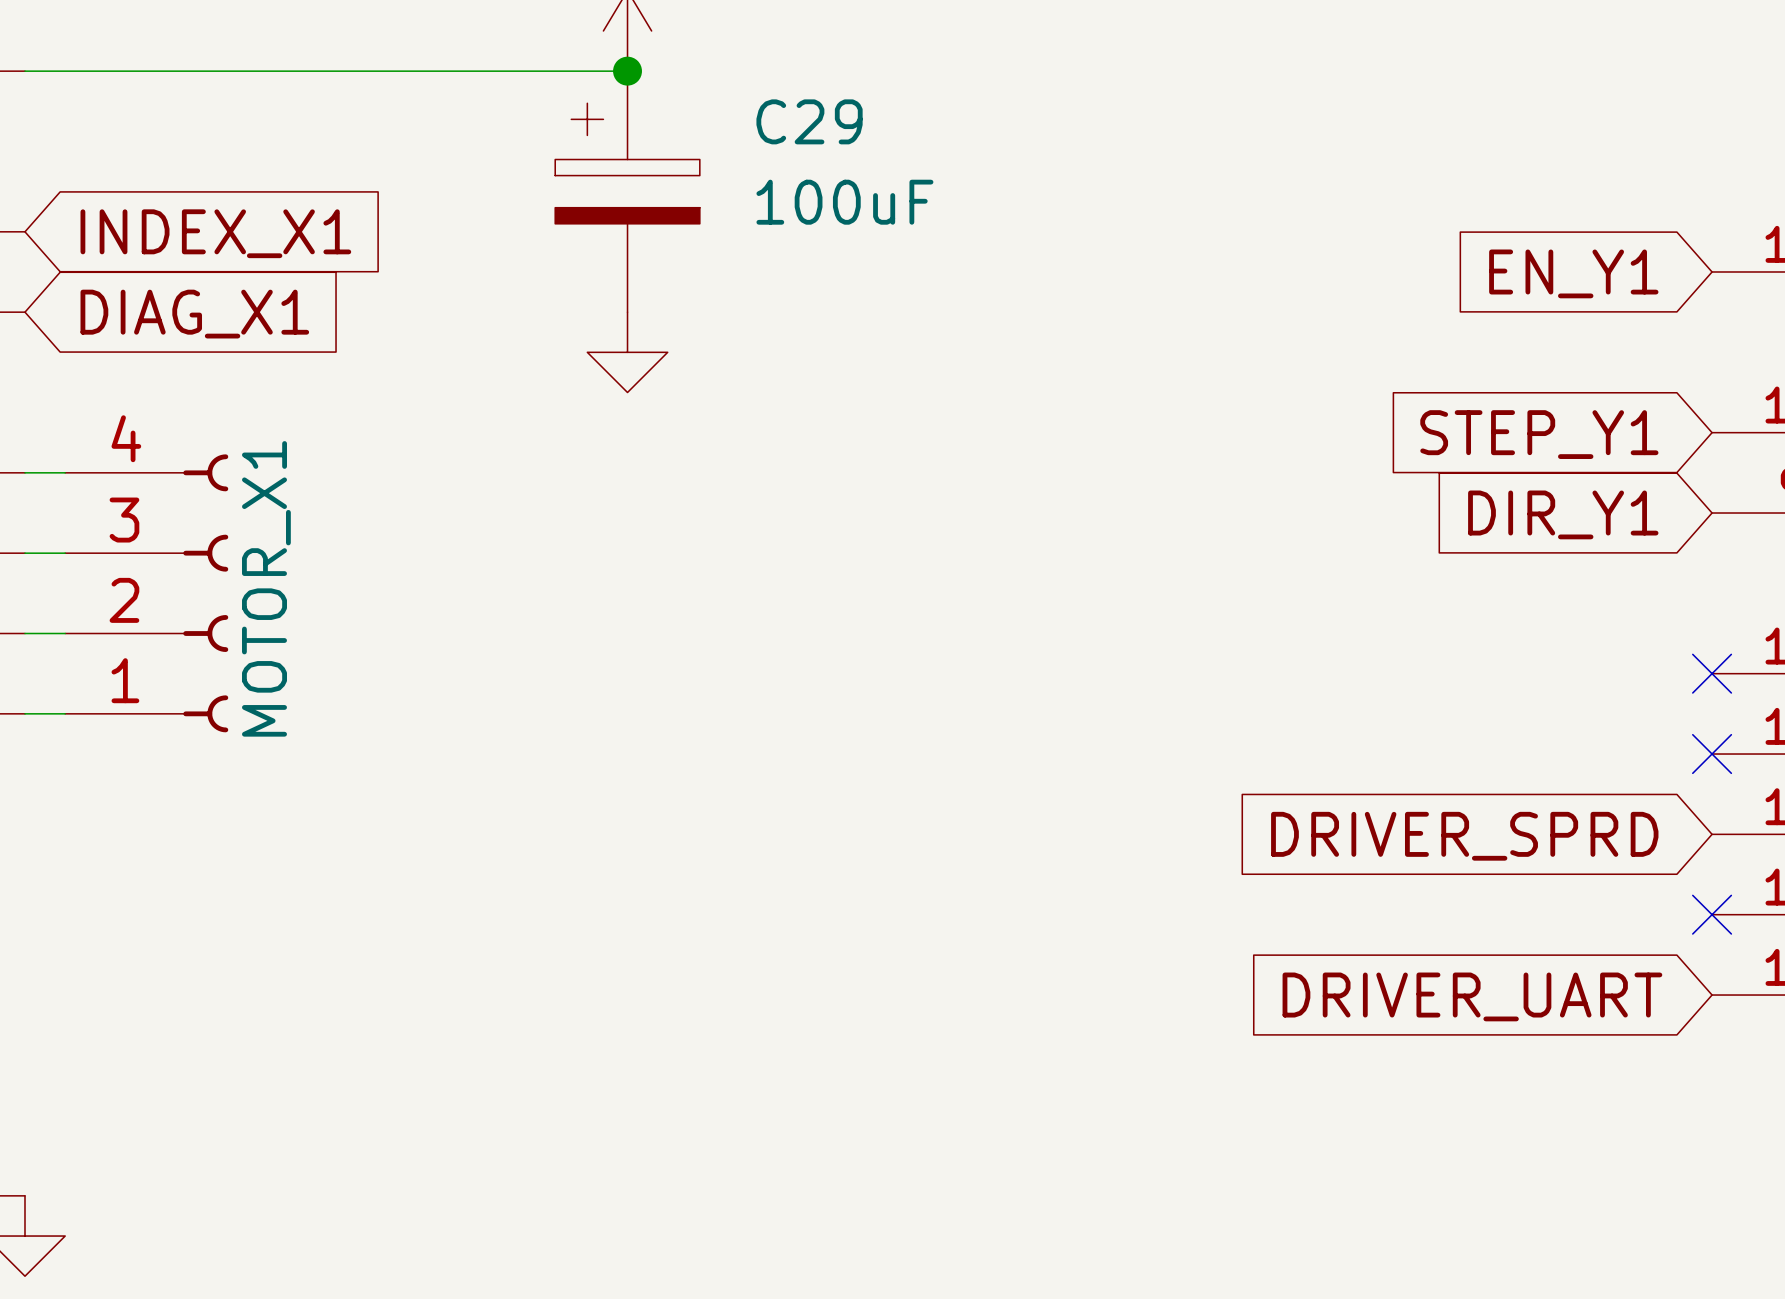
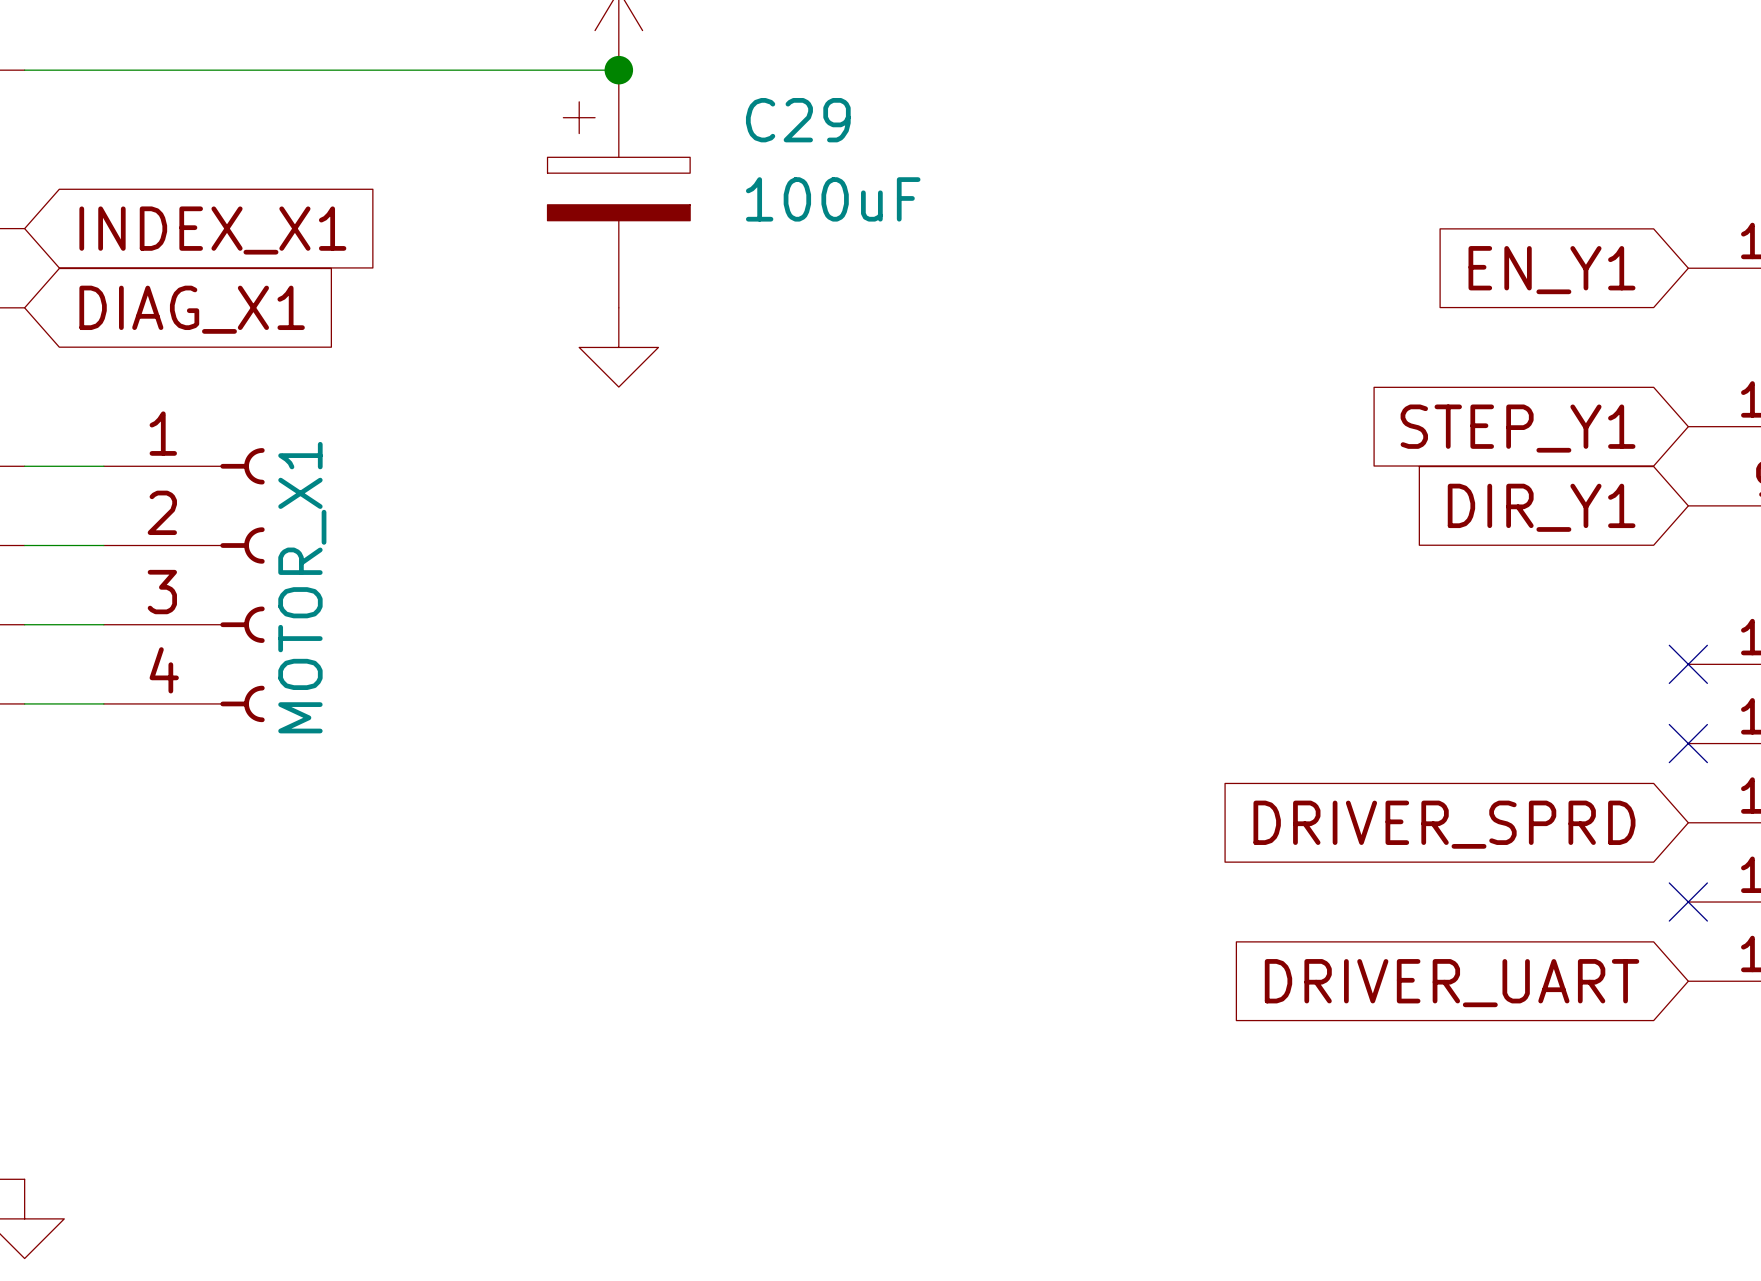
MOTOR_X1 flip: as is (205, 593) -> up-down (242, 585)

